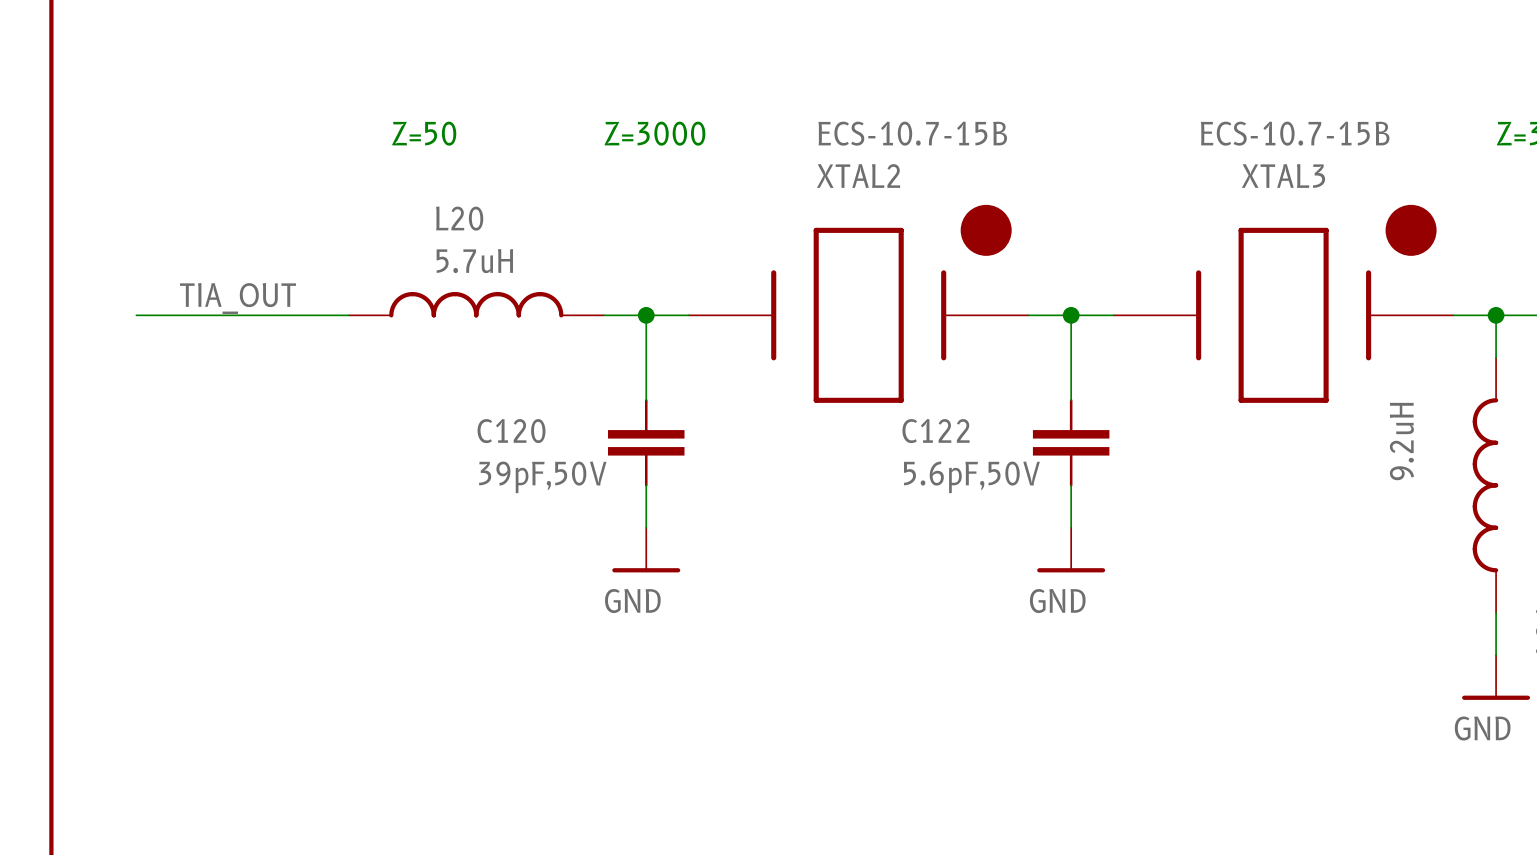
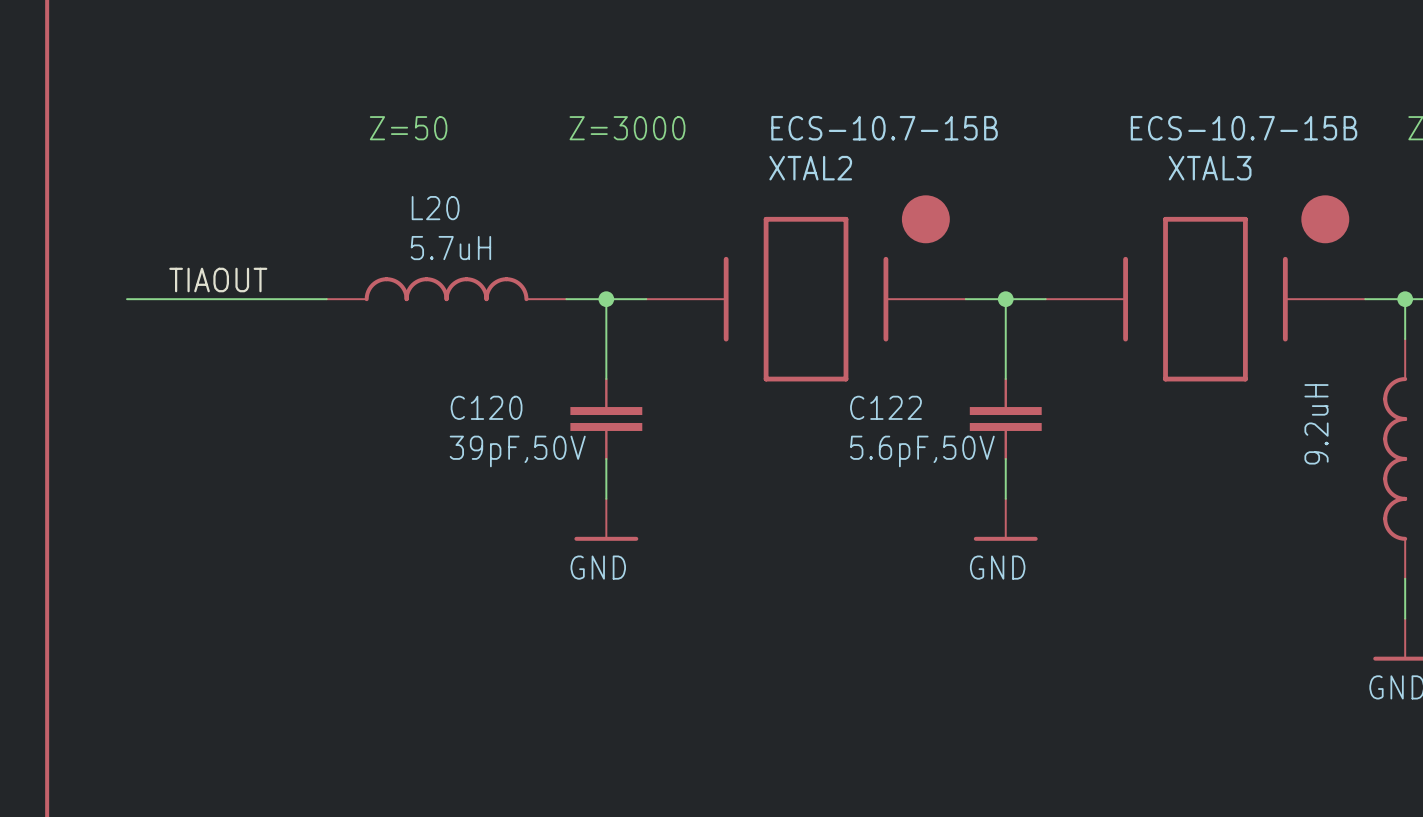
label: TIA_OUT (238, 298) -> TIAOUT (218, 280)

